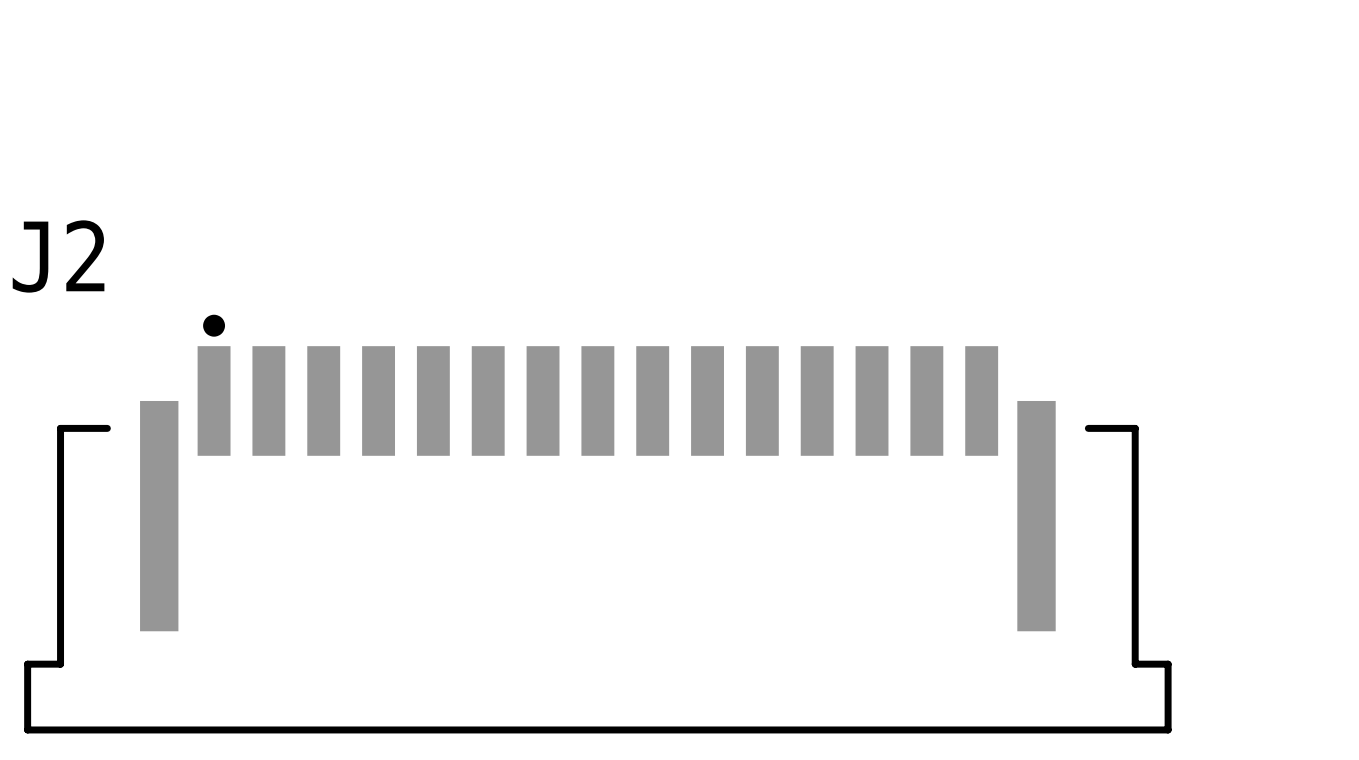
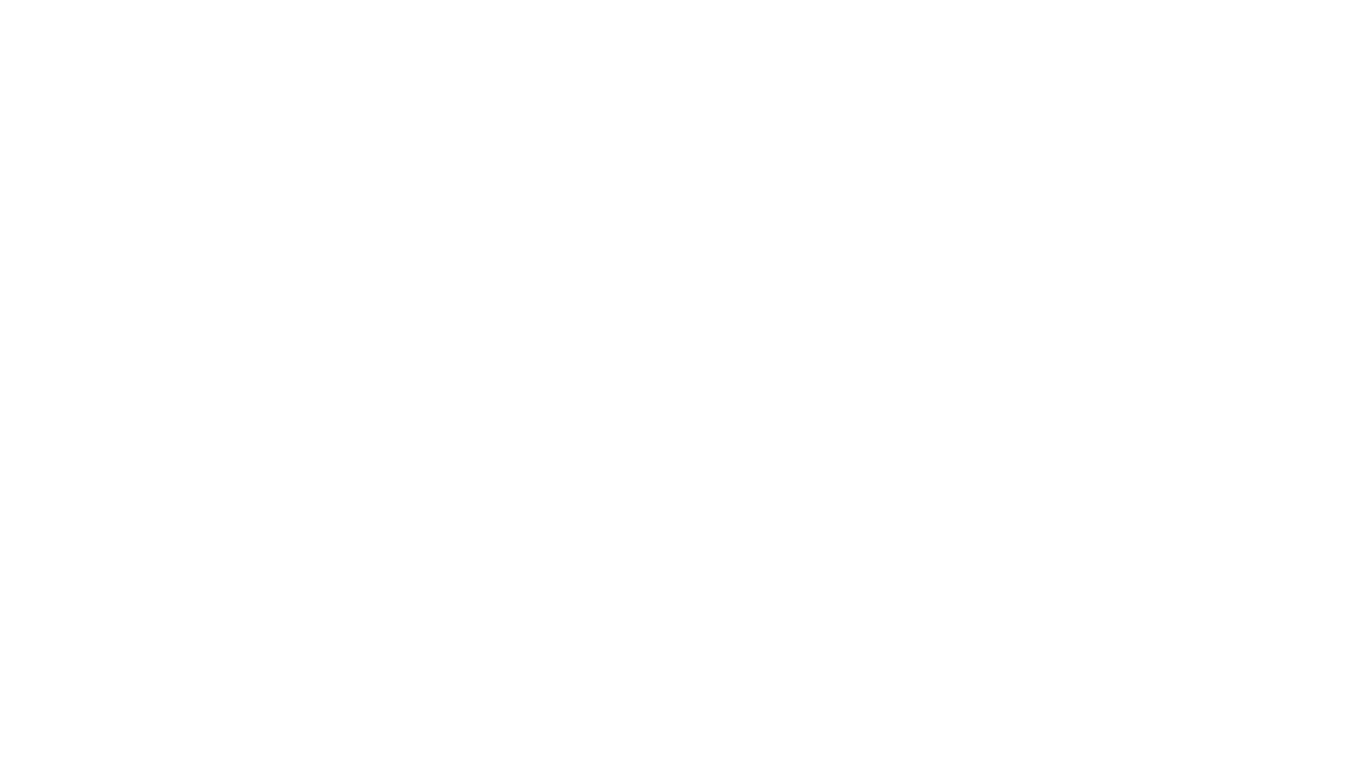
J2: (597, 524) -> none

